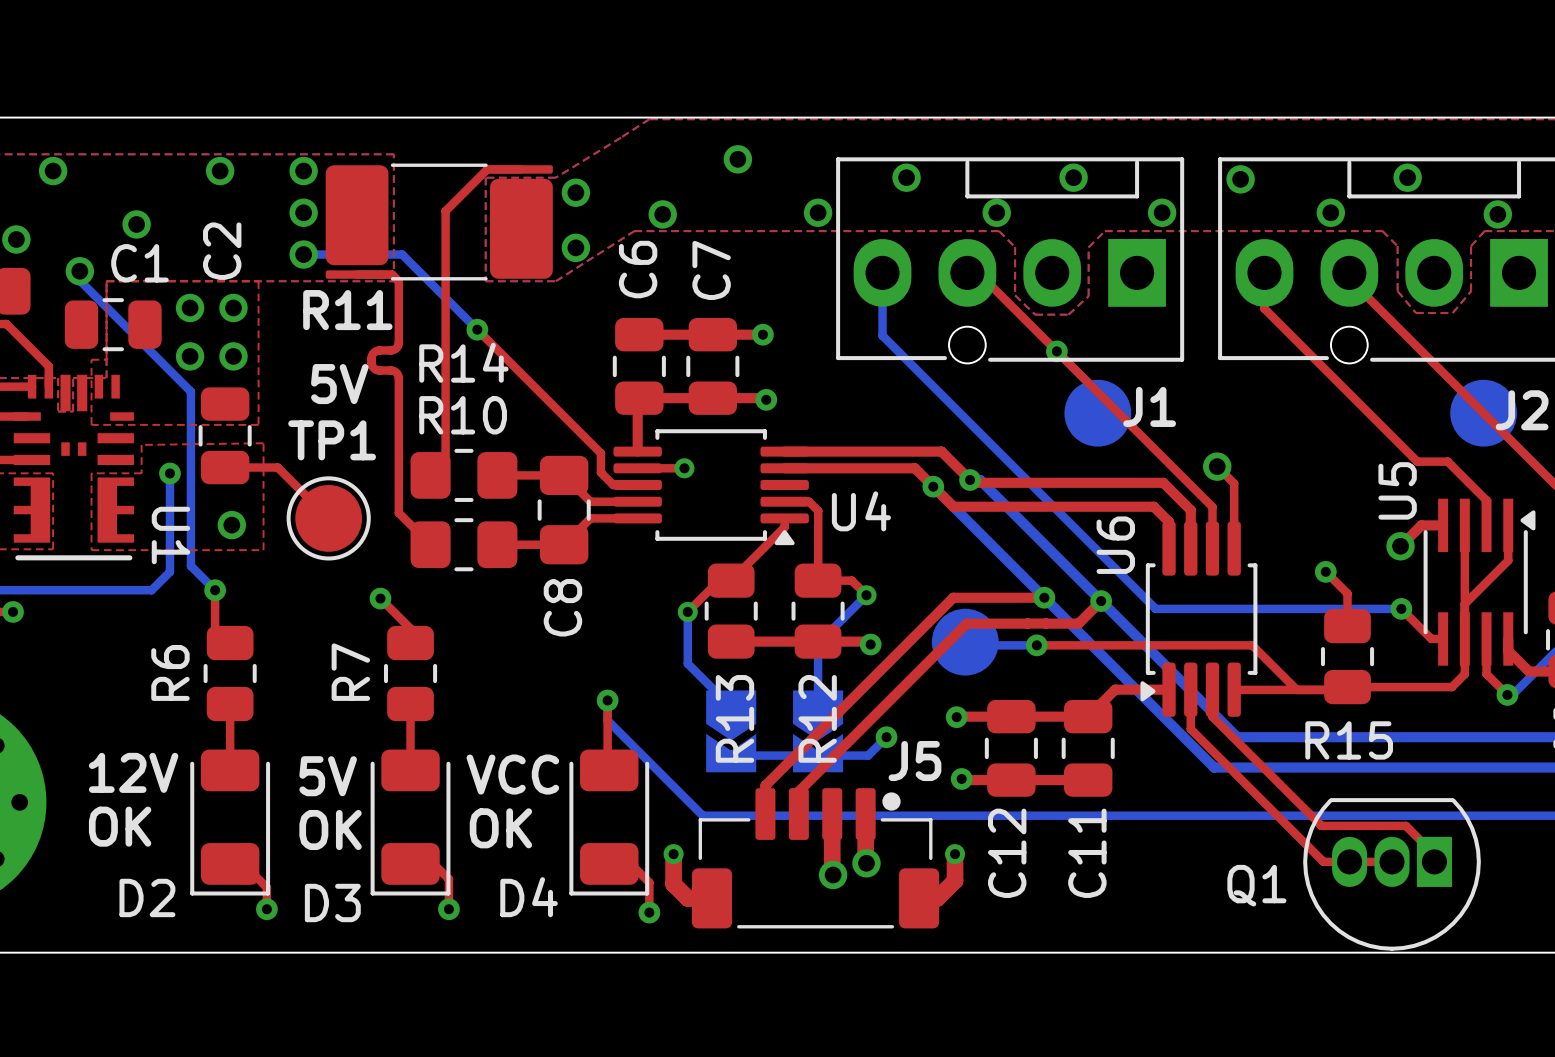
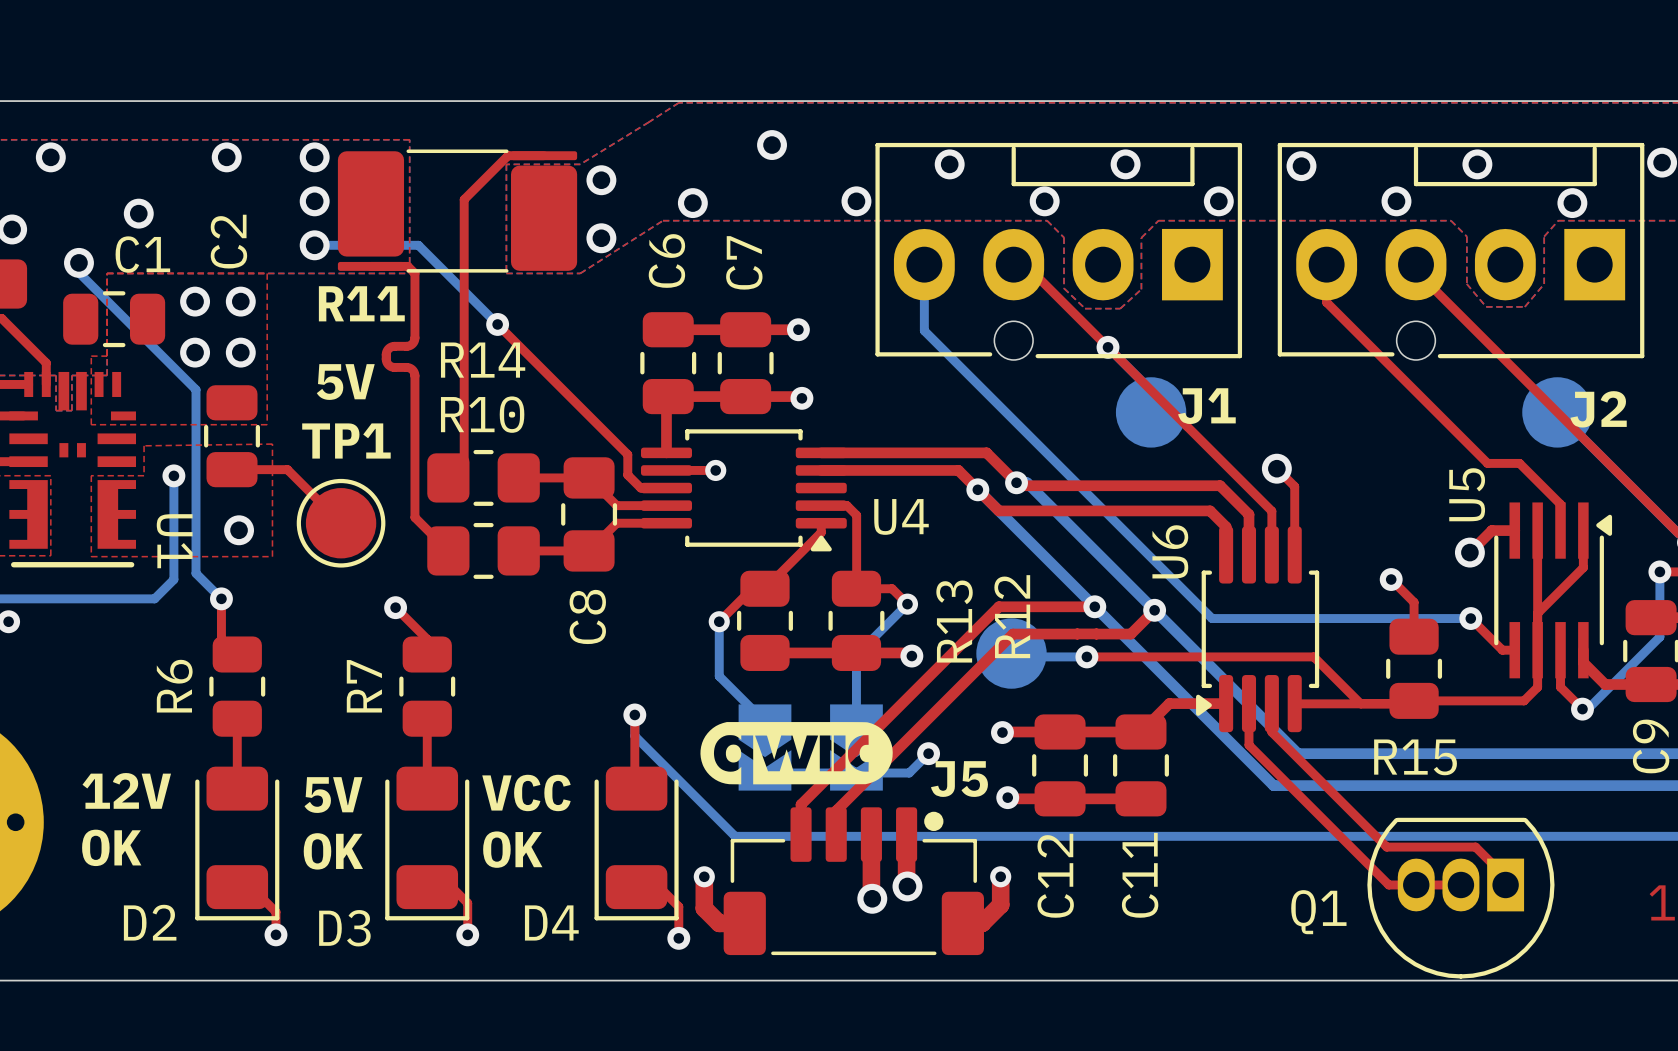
drawing: none -> [700, 722, 893, 785]
R13 name position: R13 (734, 718) -> R13 (954, 621)
R12 name position: R12 (817, 718) -> R12 (1012, 616)

